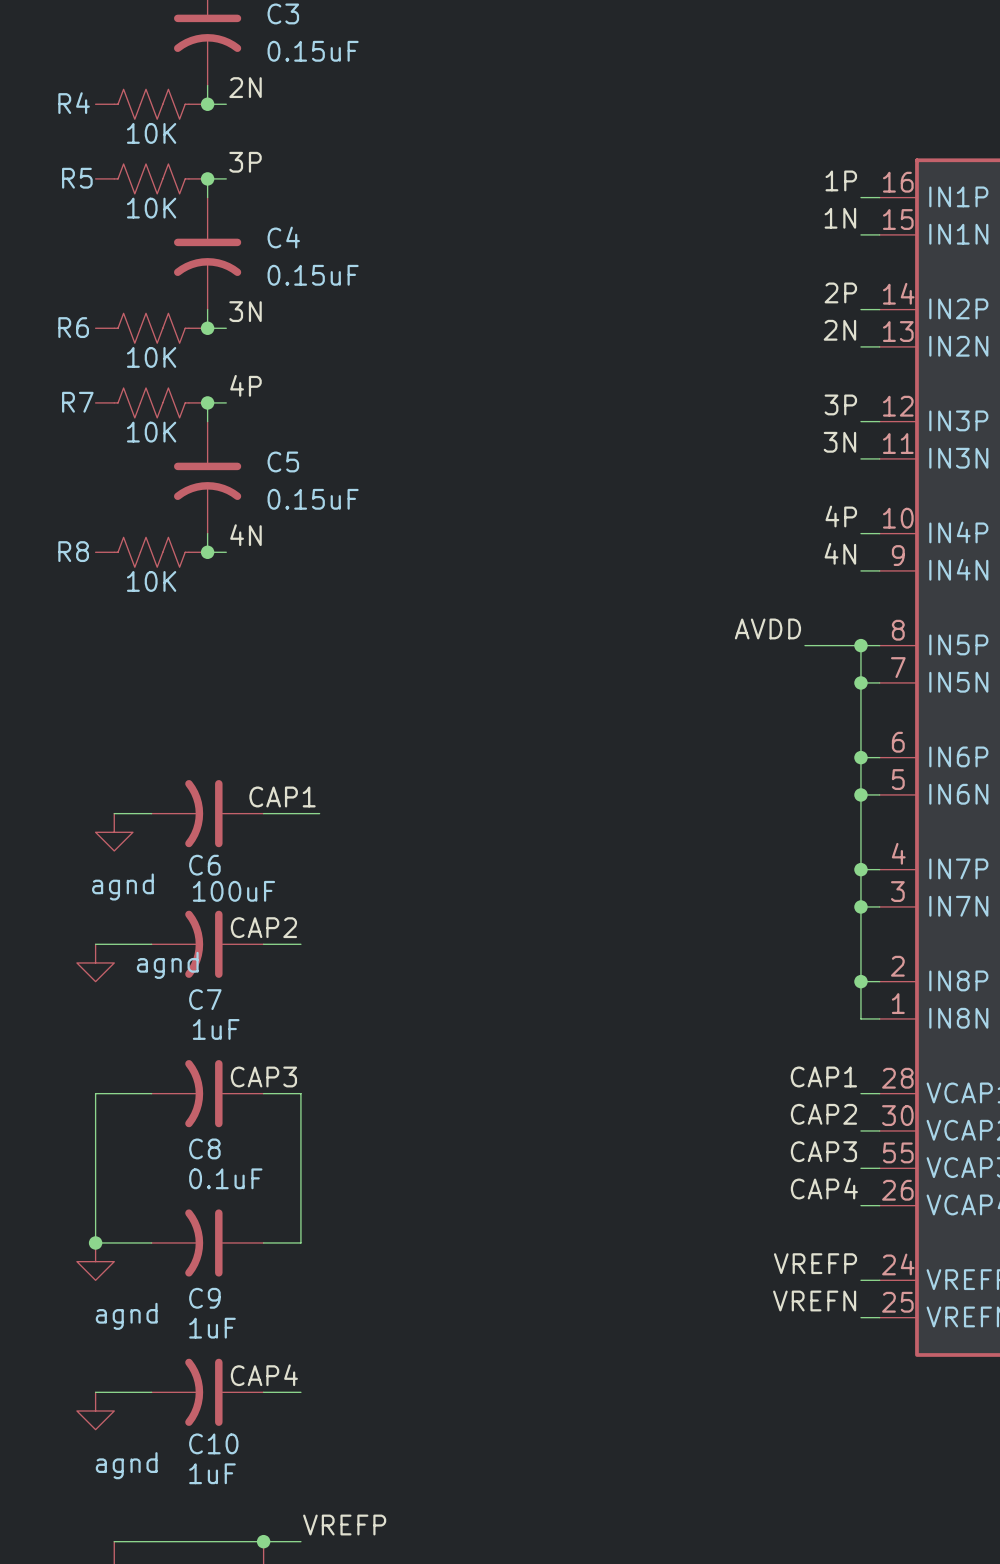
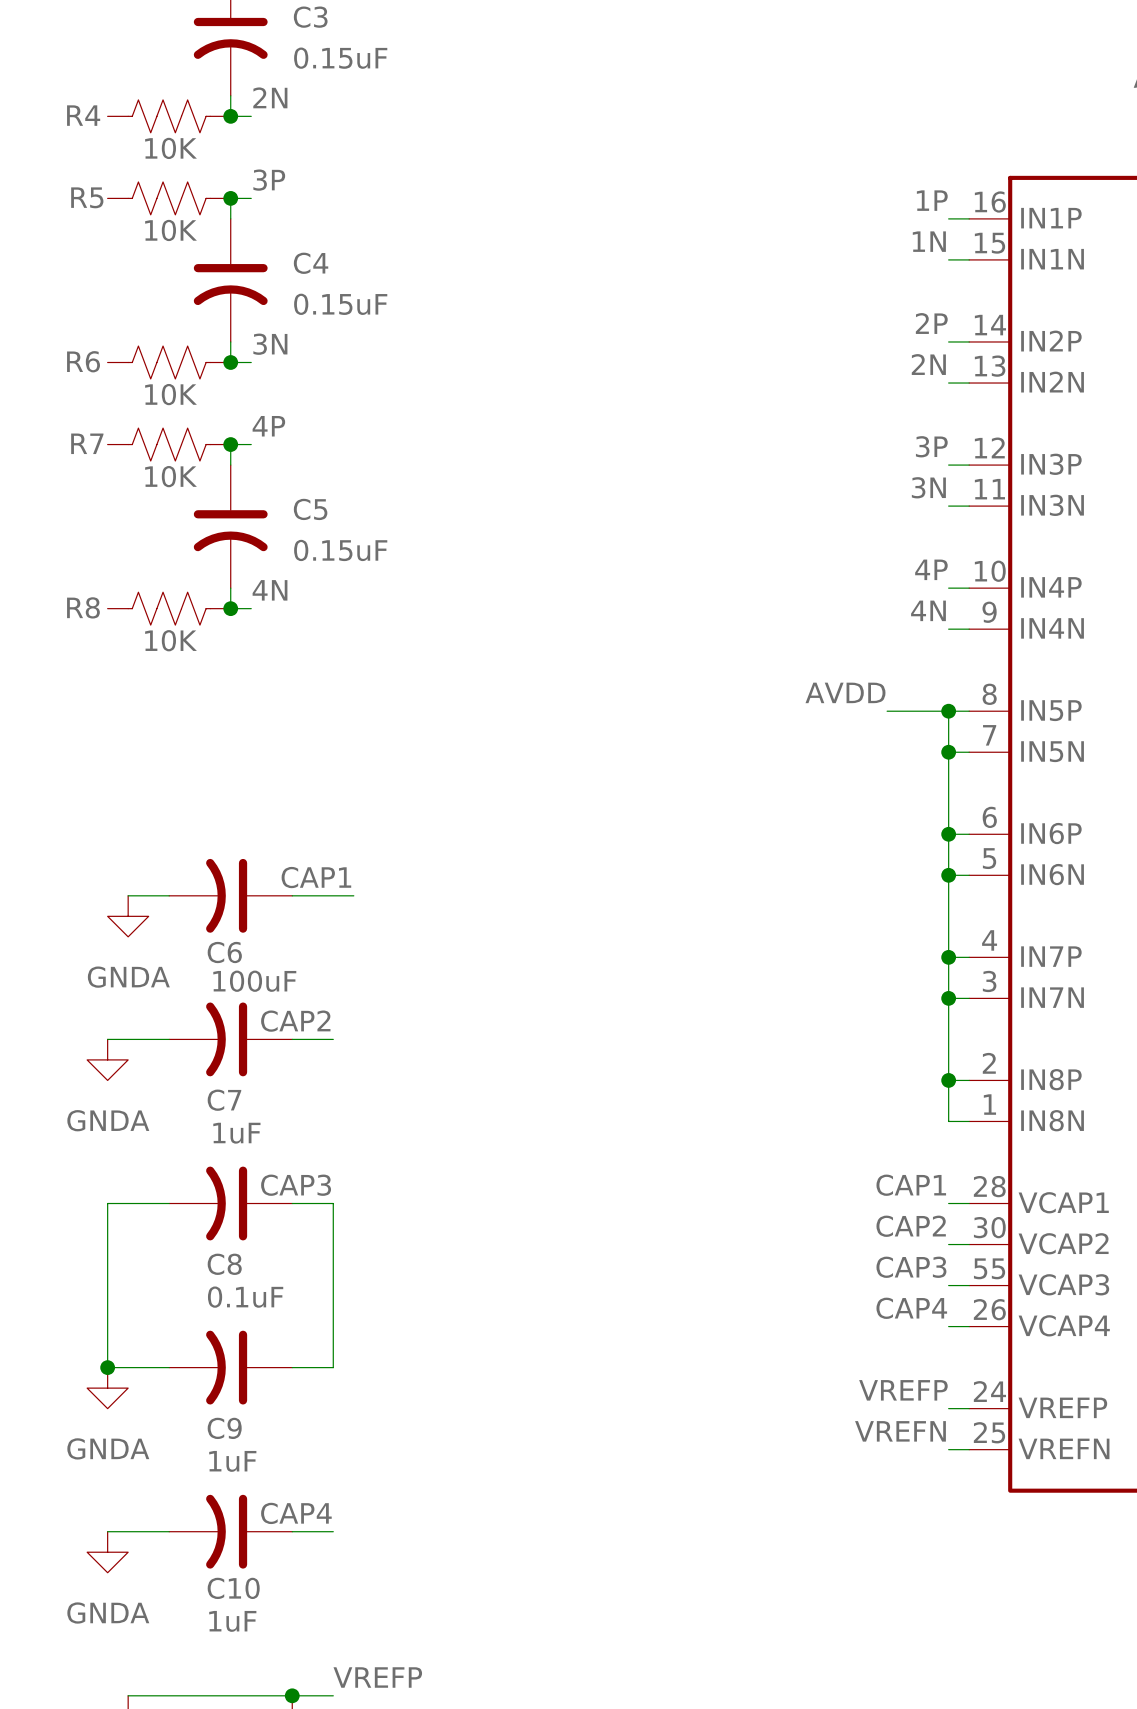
power symbol: agnd (114, 832) -> GNDA (128, 916)
power symbol: agnd (95, 962) -> GNDA (107, 1059)
power symbol: agnd (95, 1261) -> GNDA (107, 1388)
power symbol: agnd (95, 1410) -> GNDA (107, 1552)

